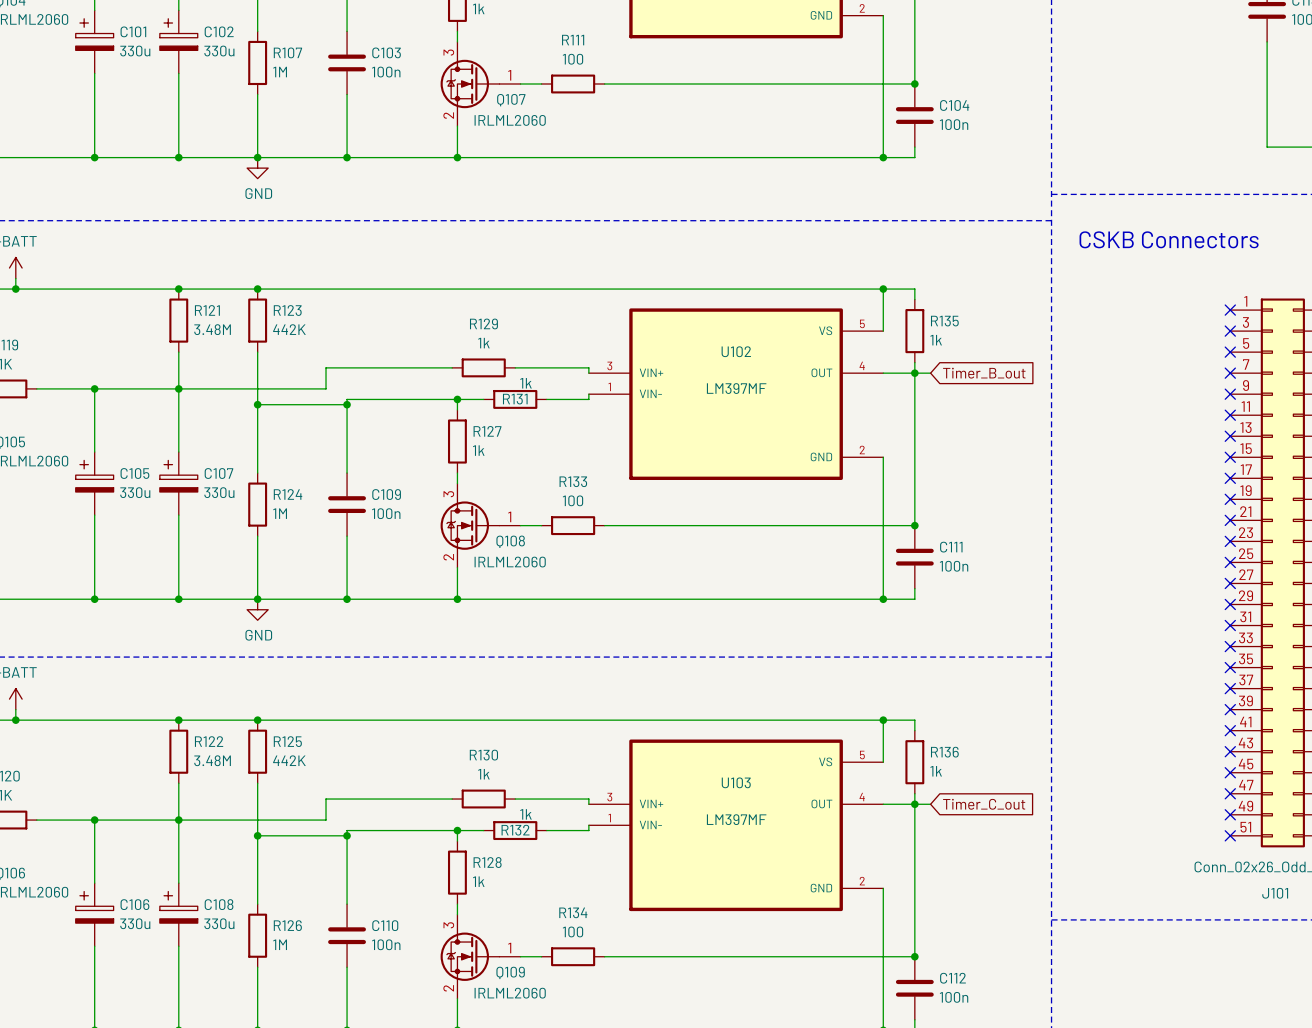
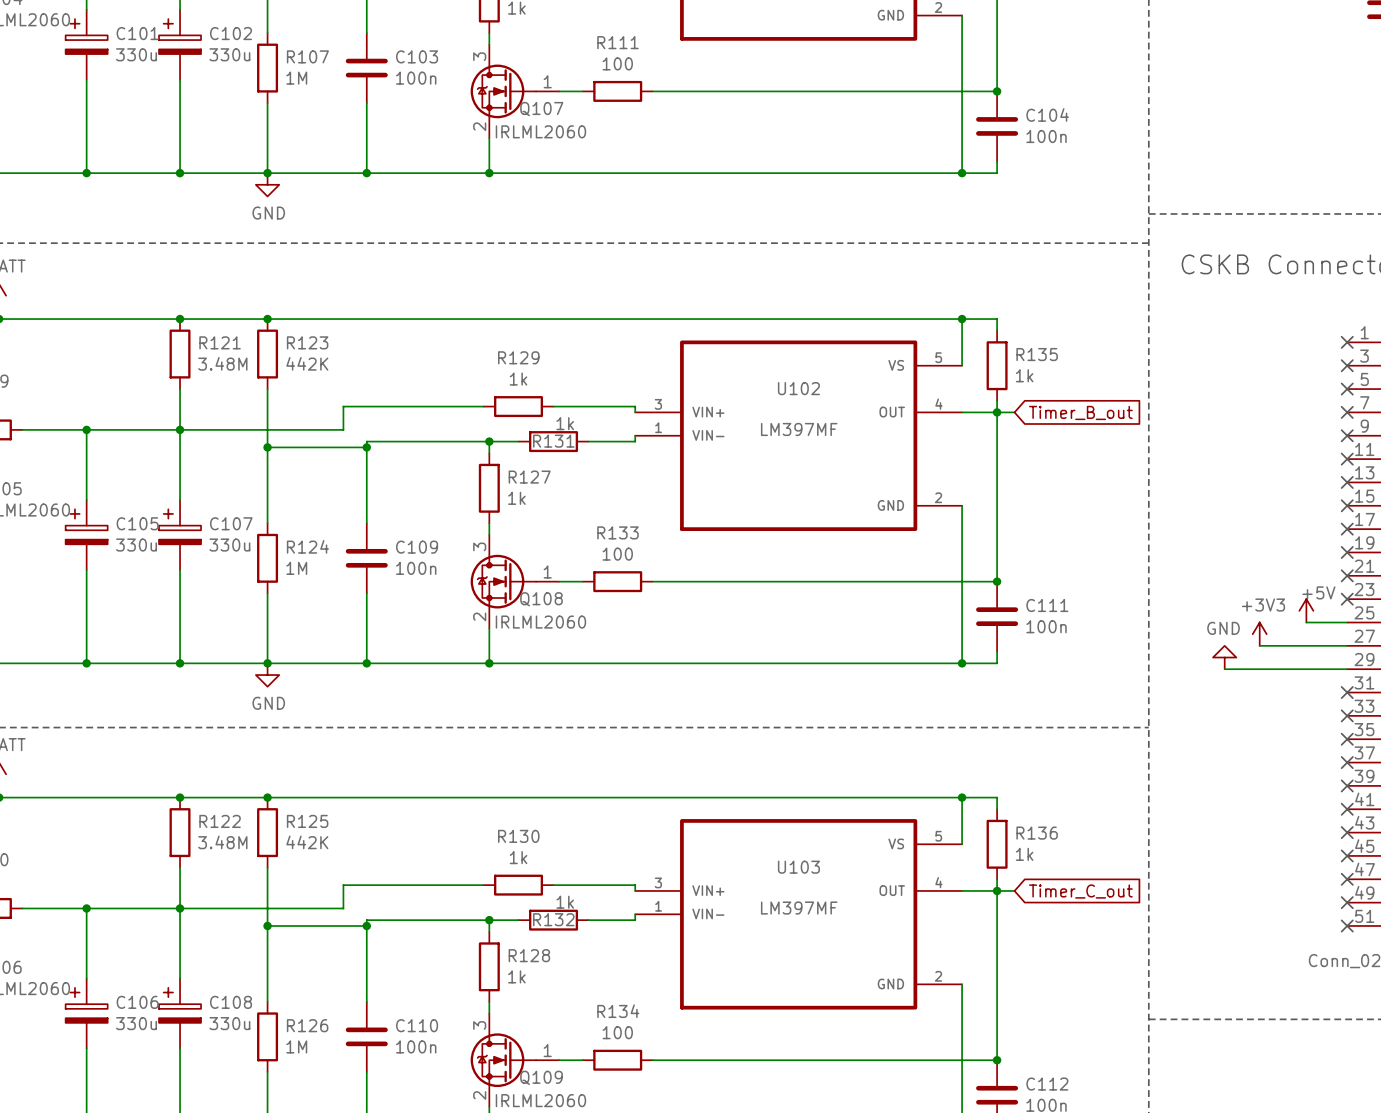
power symbol: none -> +5V (1306, 610)
wire: none -> (1306, 622) (1347, 622)
no-connect mark: (1230, 562) -> none
power symbol: none -> +3V3 (1259, 634)
wire: none -> (1259, 645) (1347, 645)
no-connect mark: (1230, 583) -> none
power symbol: none -> GND (1224, 657)
wire: none -> (1224, 669) (1347, 669)
no-connect mark: (1230, 604) -> none

